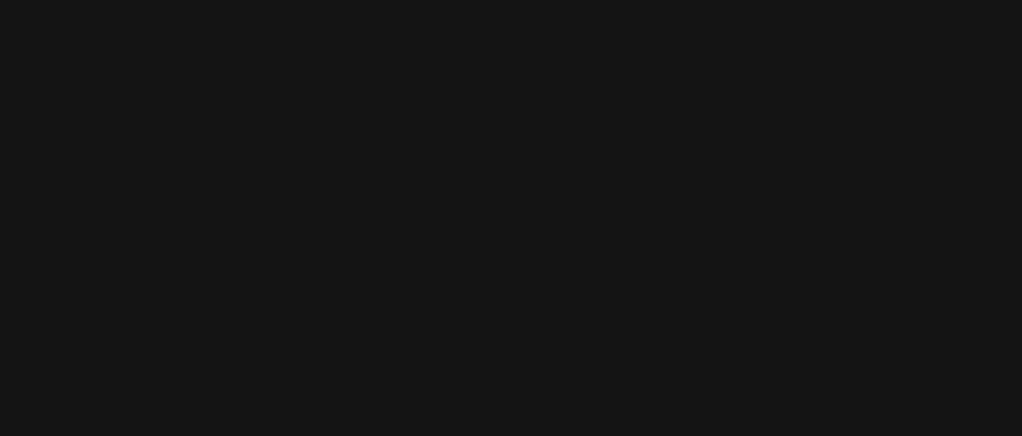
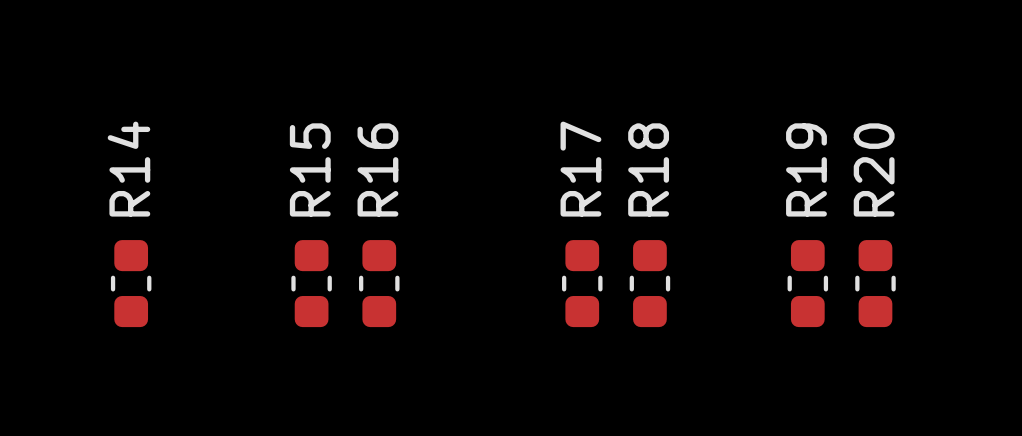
R14: none -> (131, 283)
R15: none -> (311, 283)
R16: none -> (379, 283)
R17: none -> (582, 283)
R18: none -> (649, 283)
R19: none -> (807, 283)
R20: none -> (875, 283)

